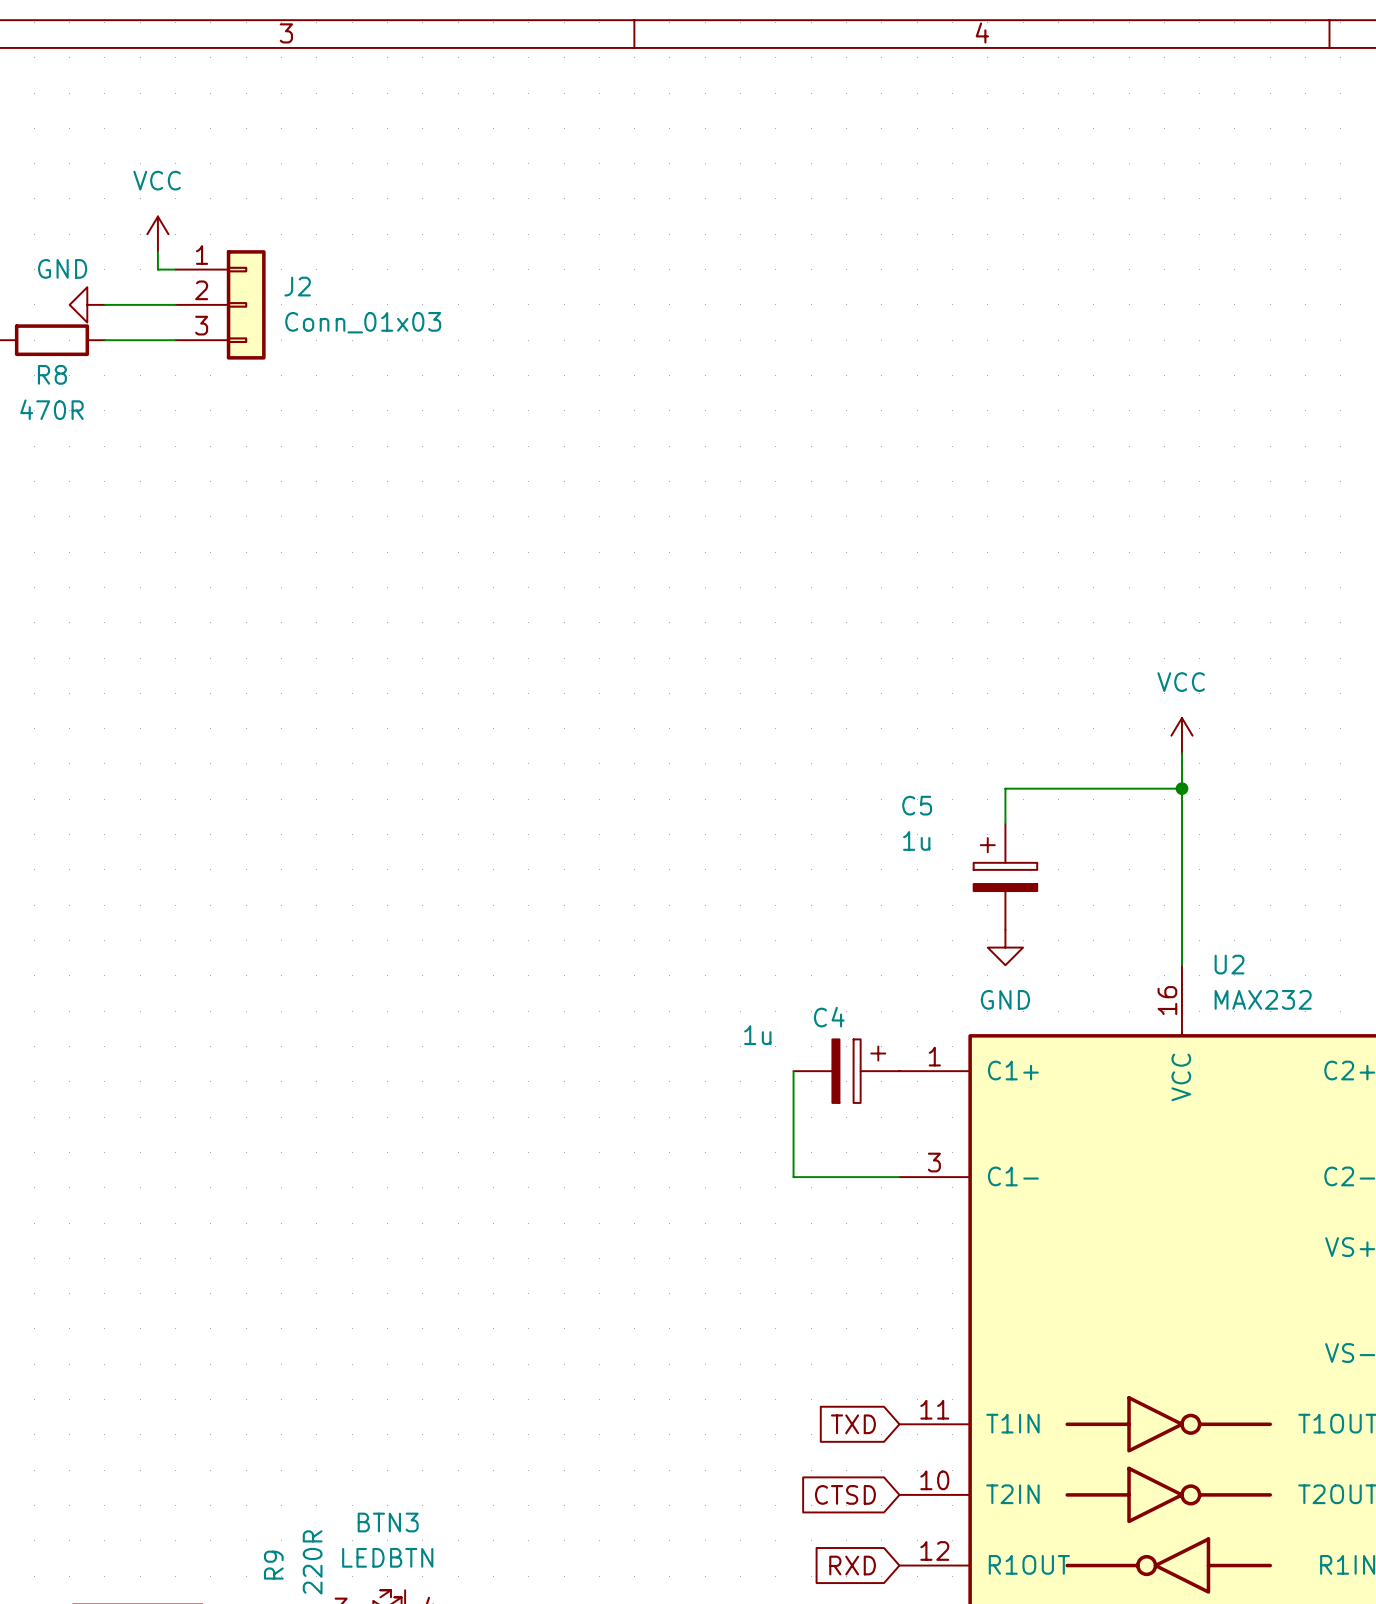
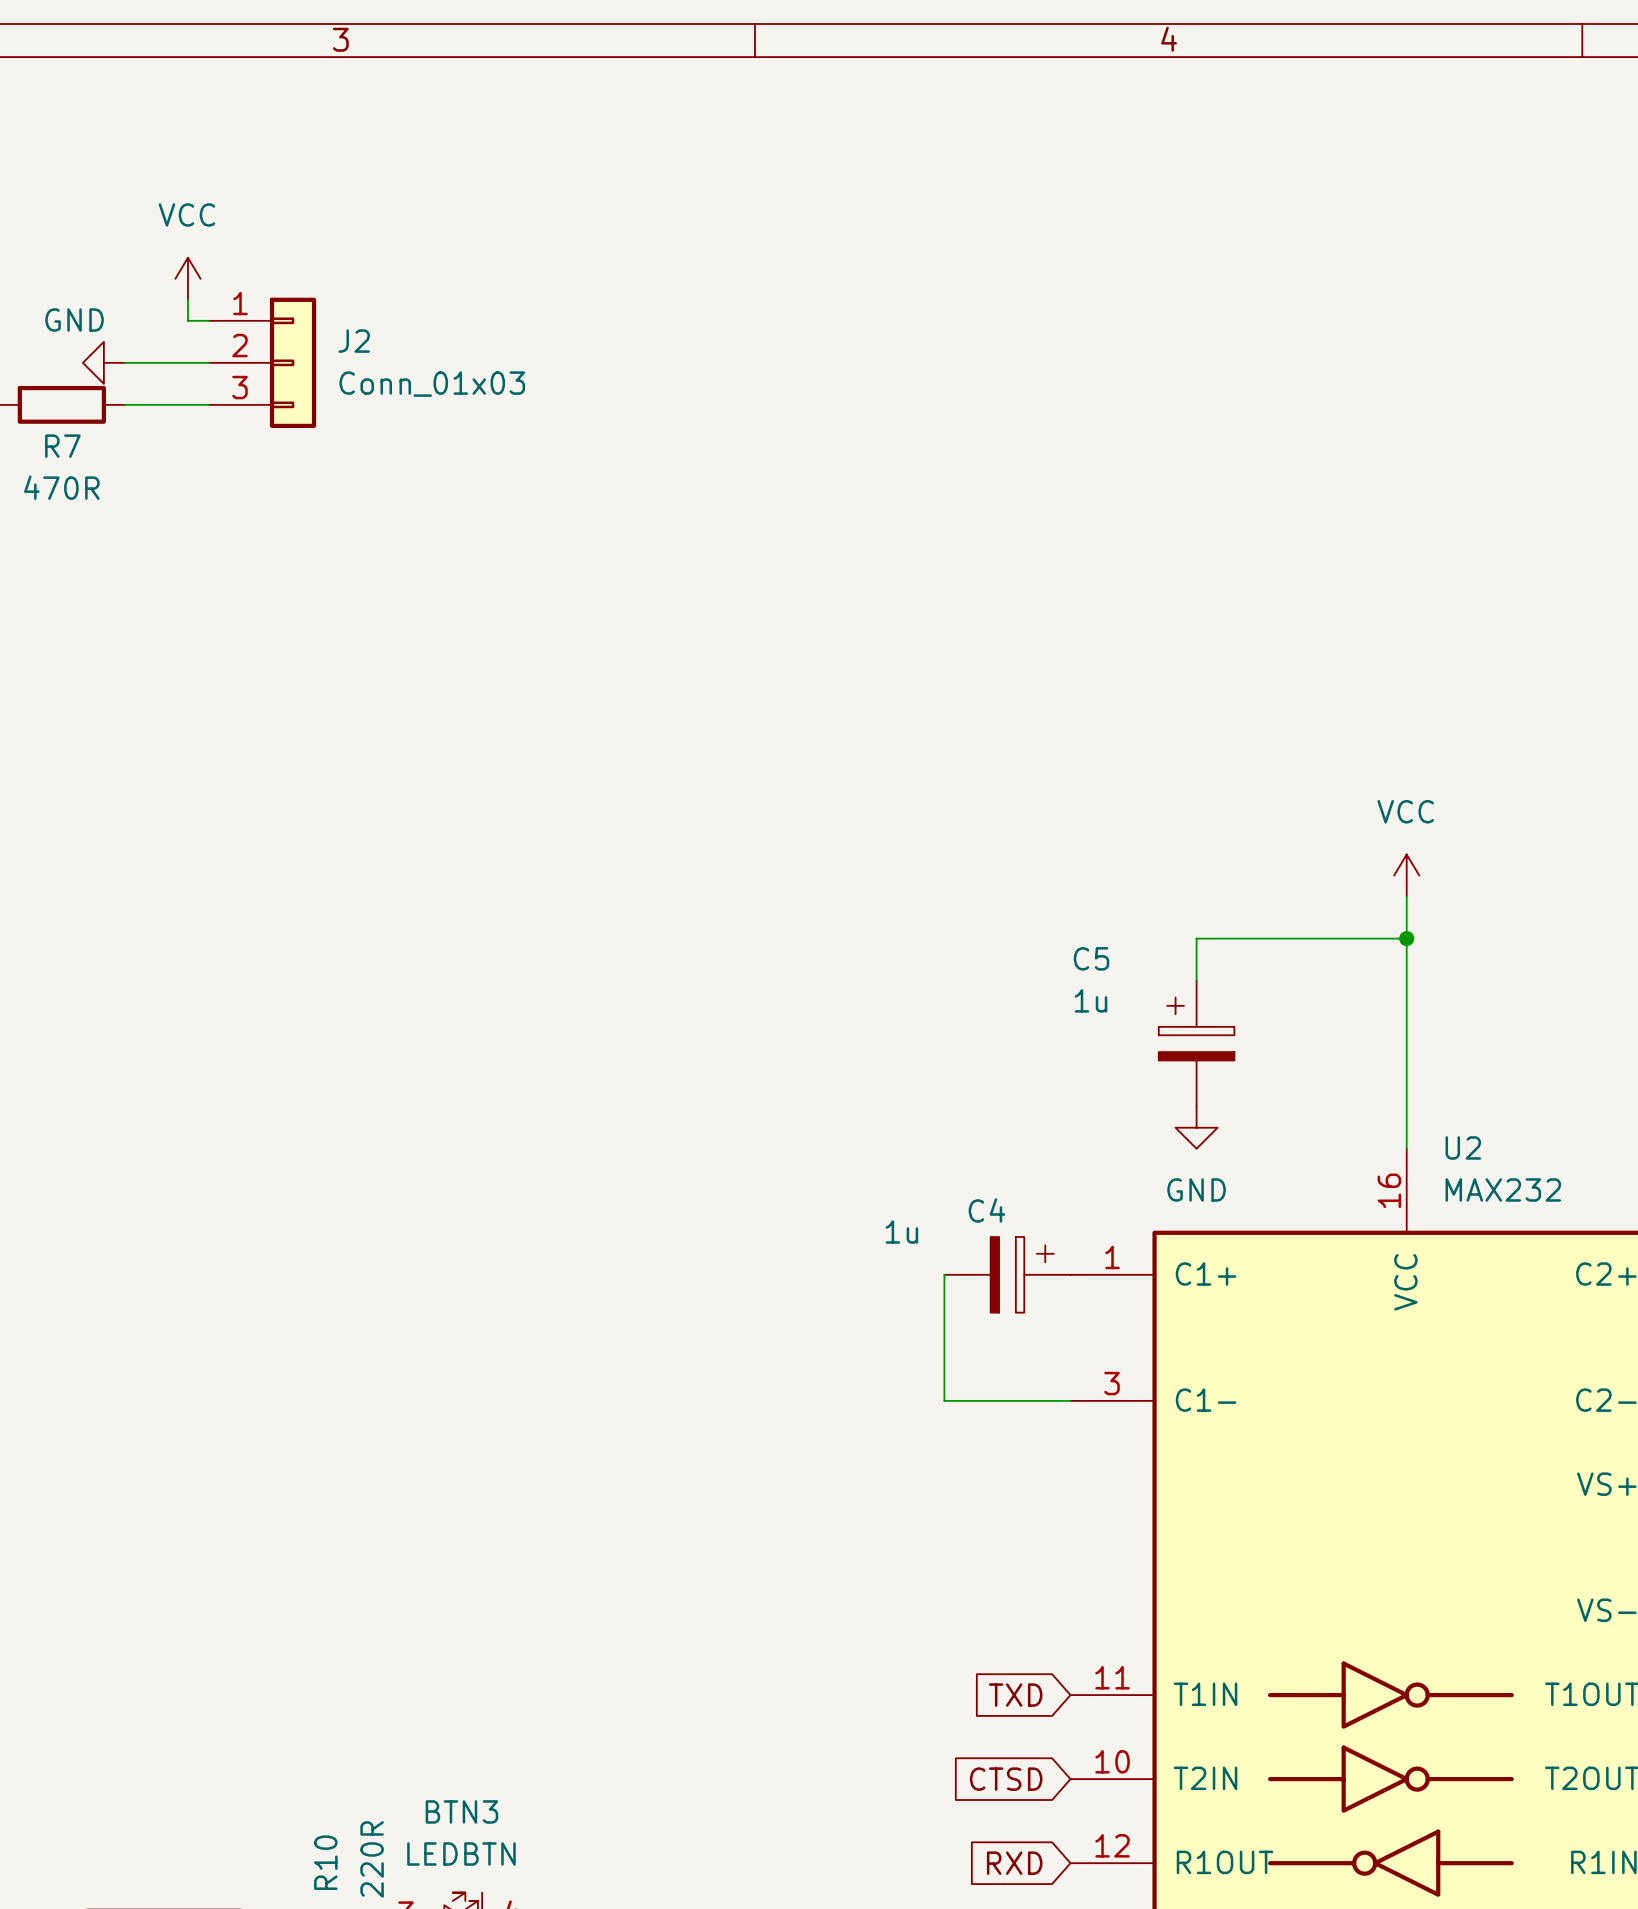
R8 name: R8 (52, 374) -> R7 (62, 446)
R9 name: R9 (273, 1565) -> R10 (325, 1862)

